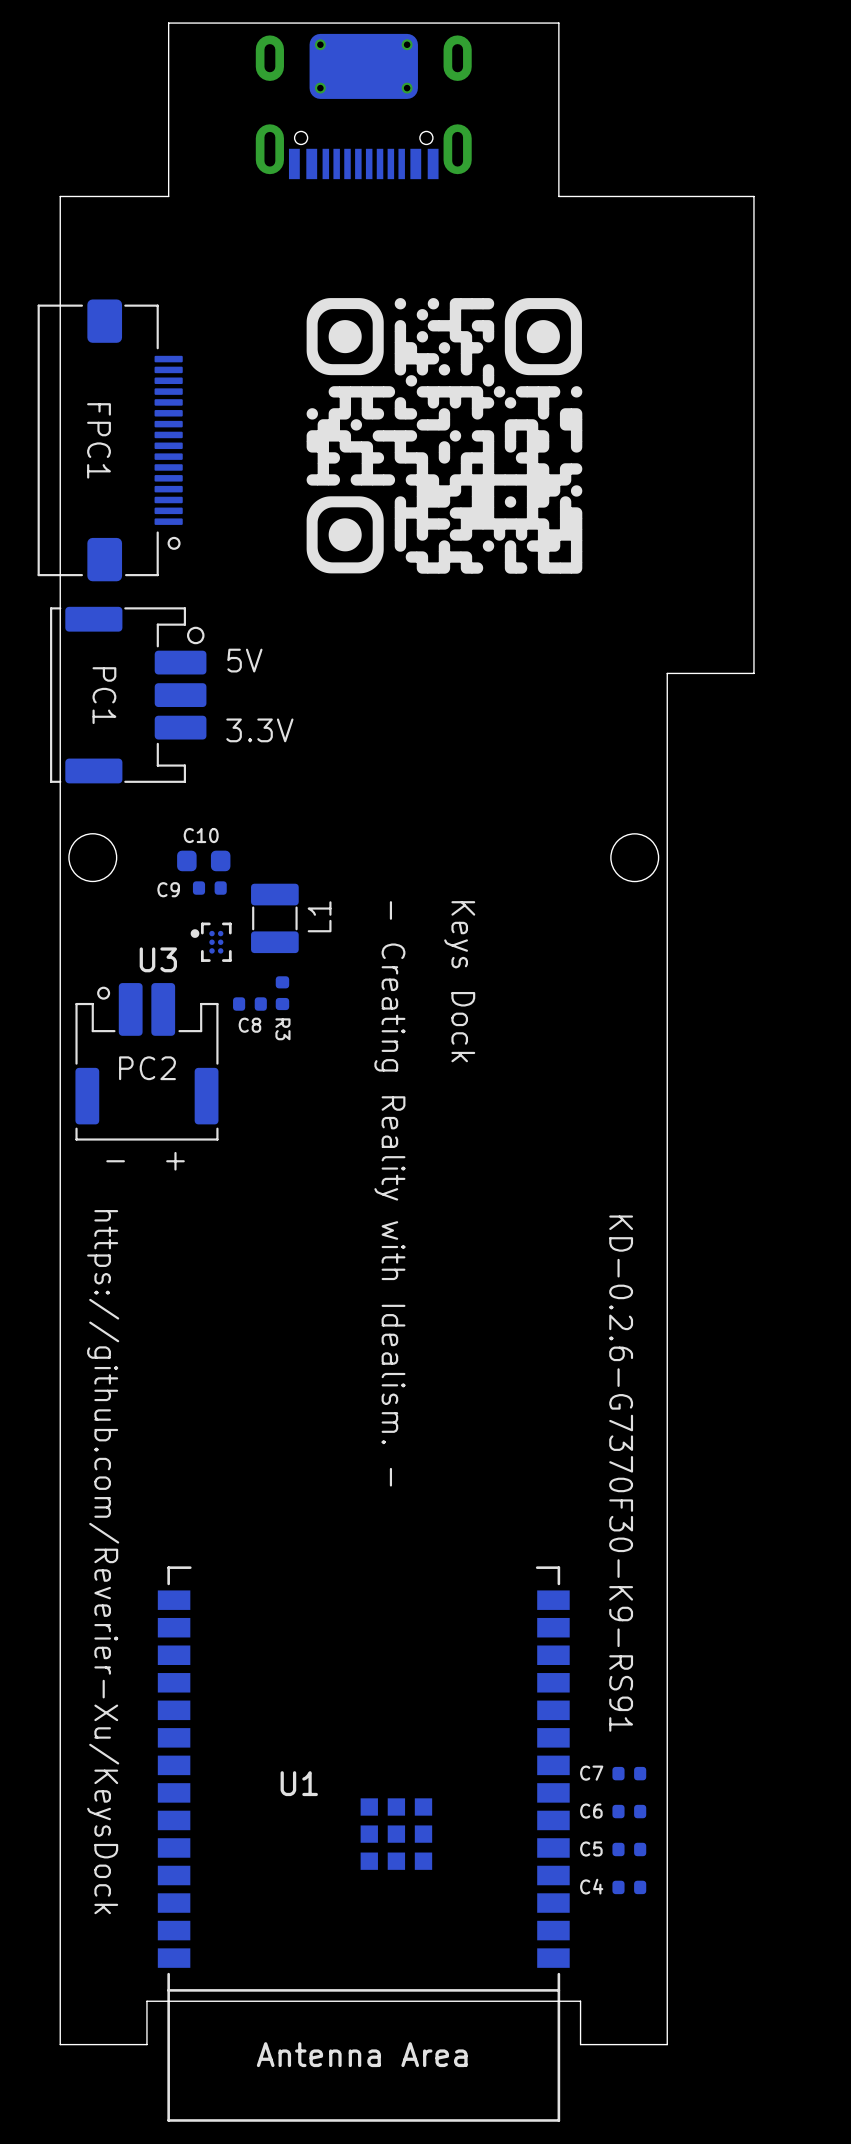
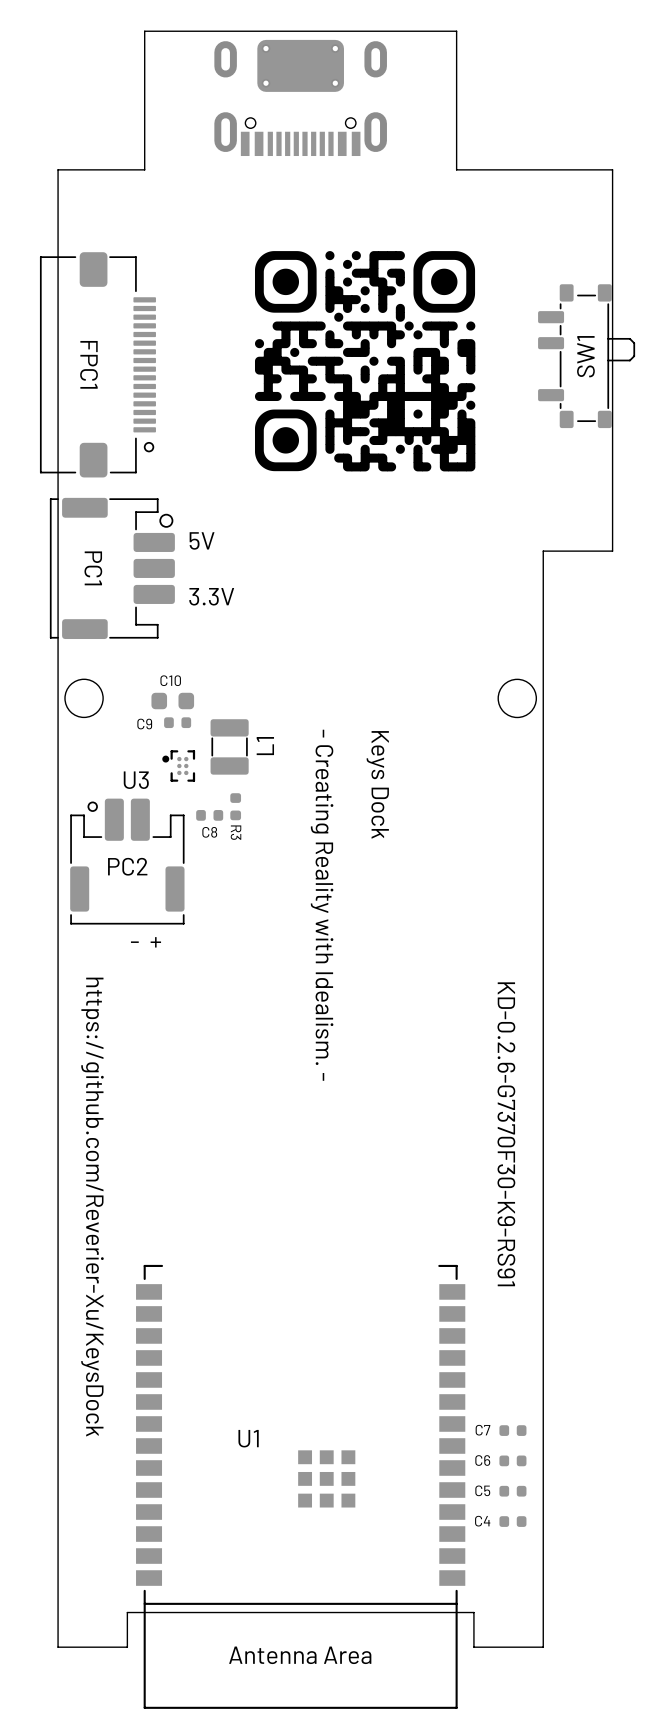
SW1: none -> (586, 356)

